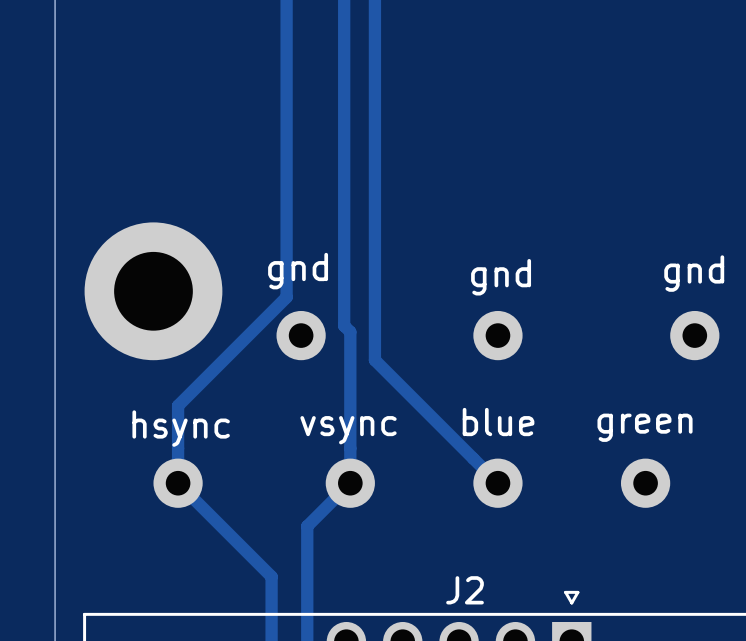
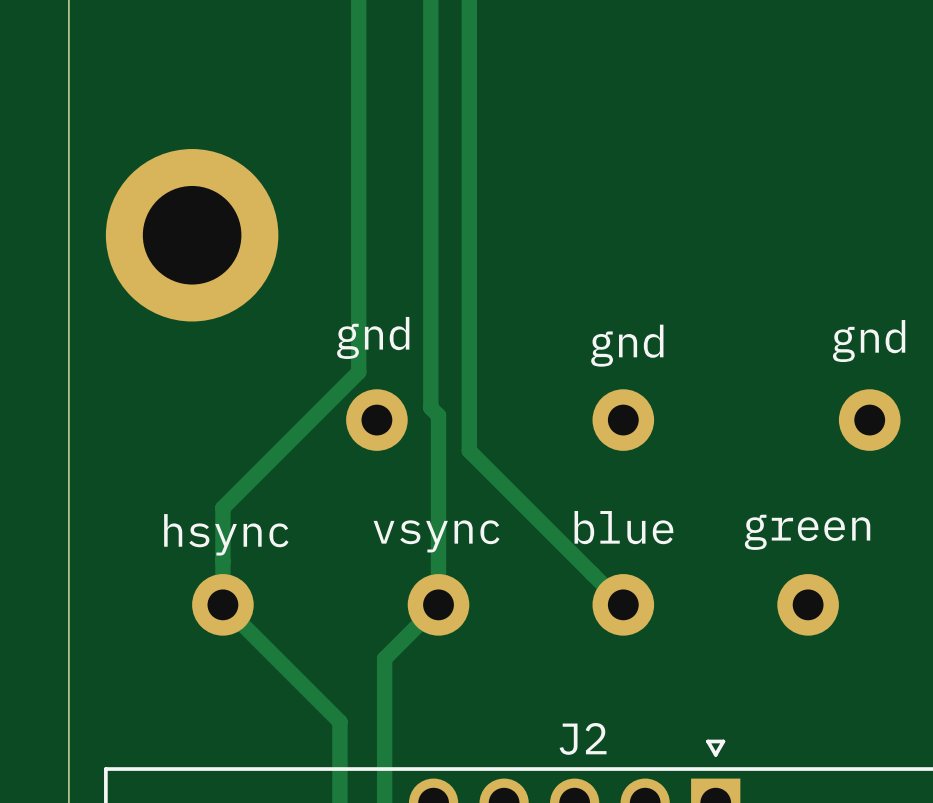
part position: (153, 291) -> (192, 235)

